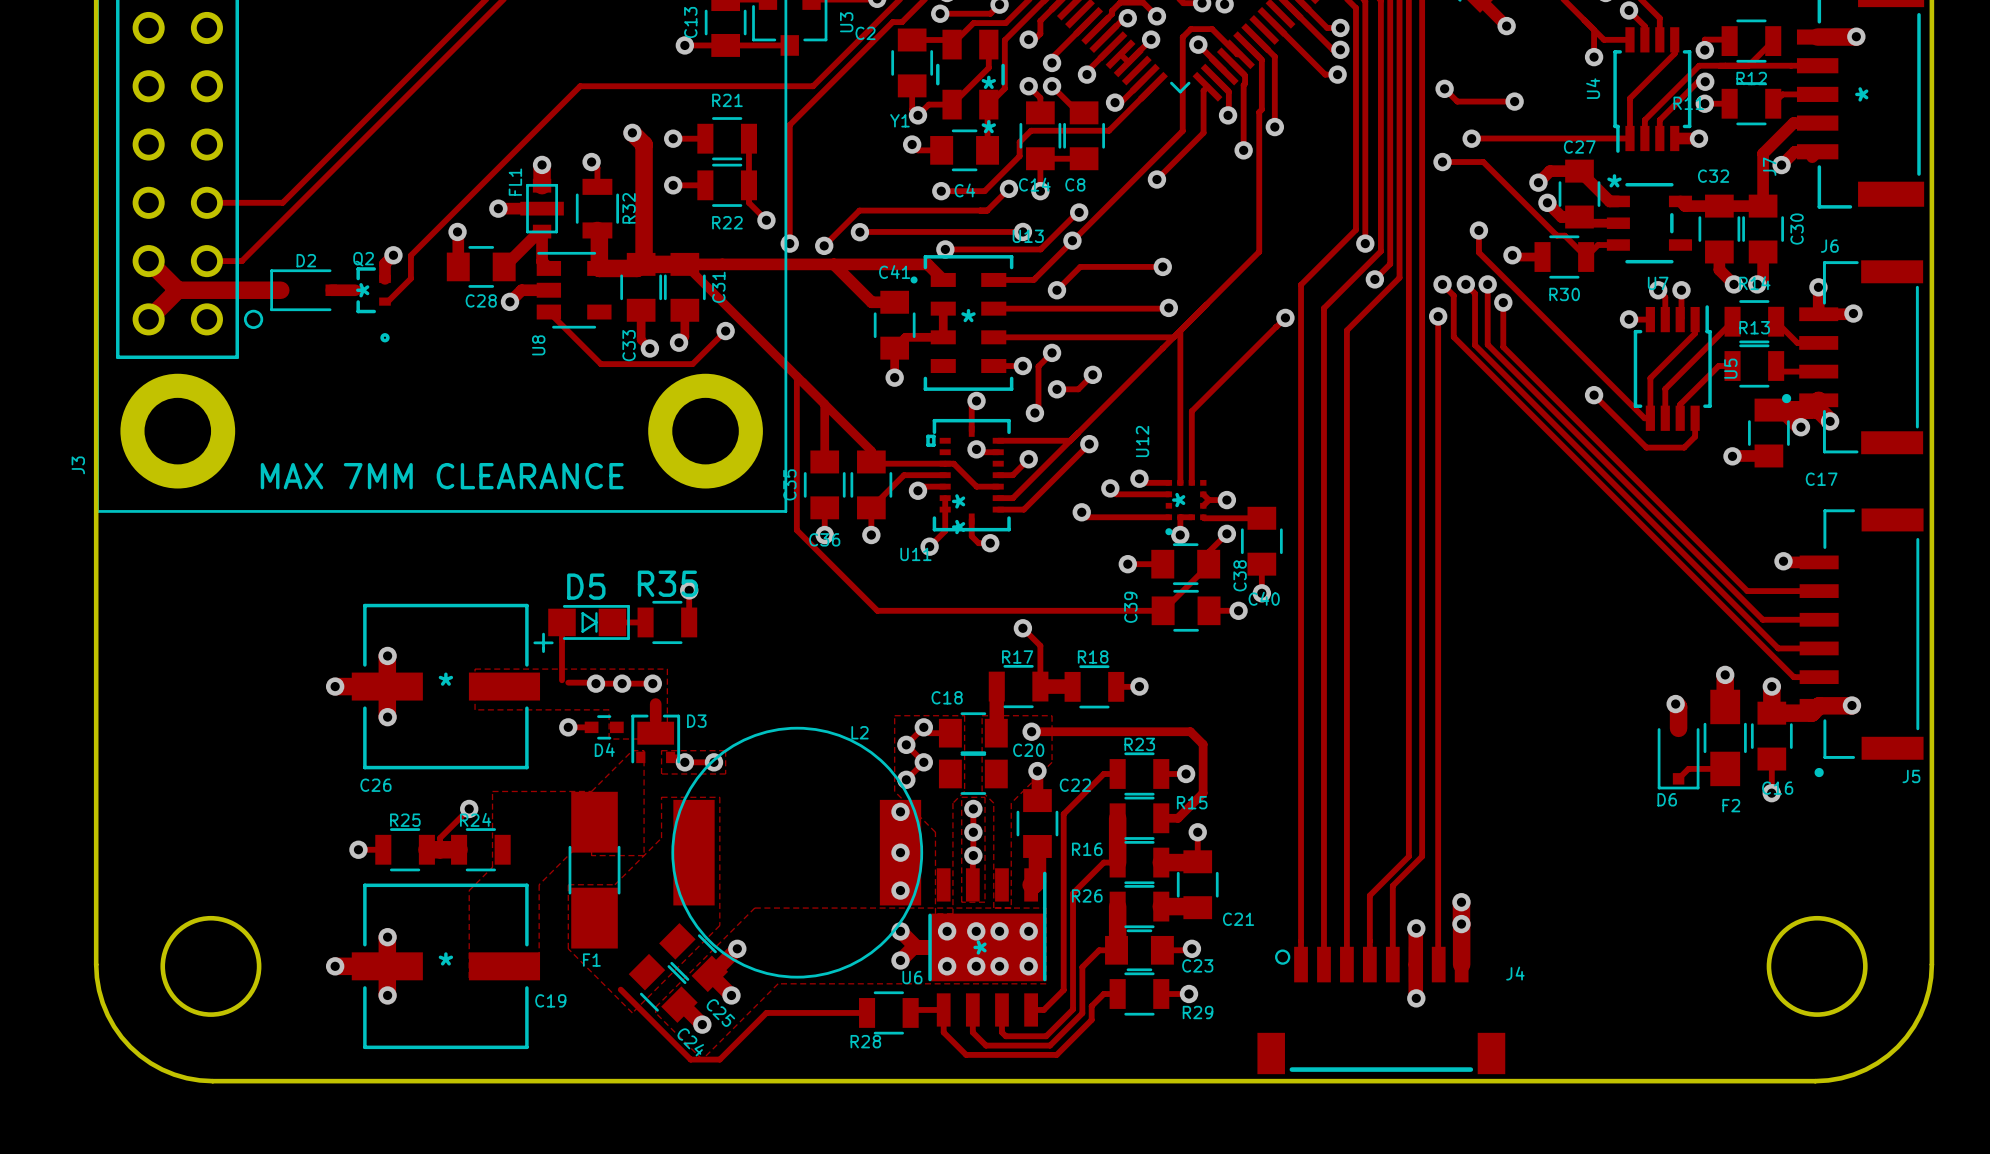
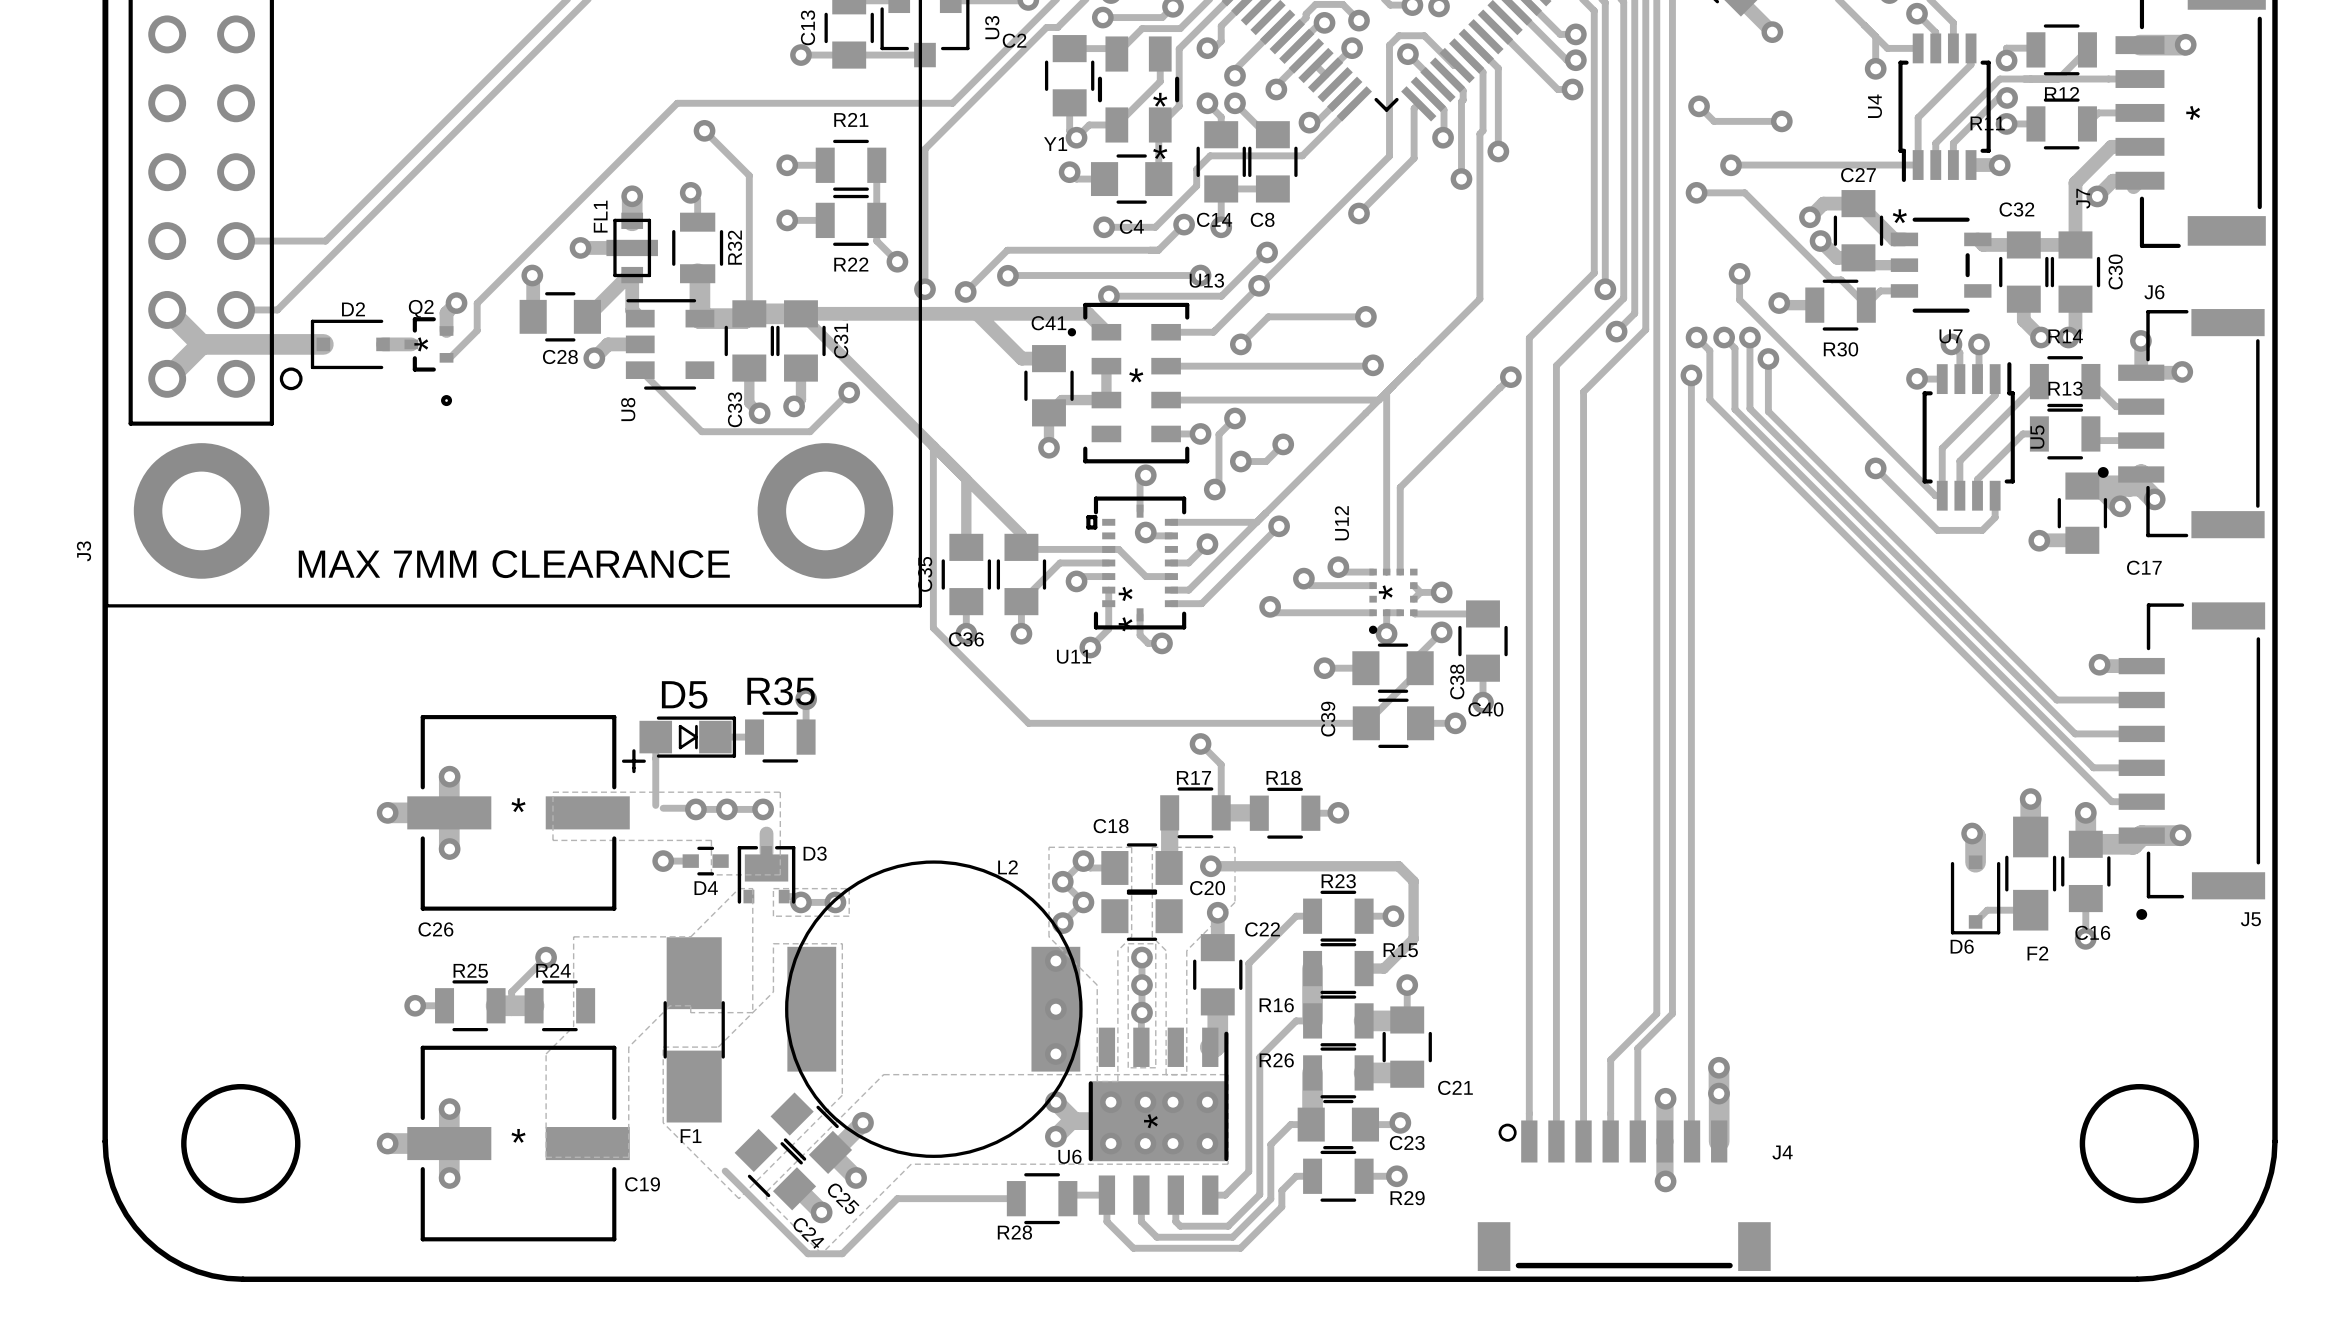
track: (632, 132) (644, 144) (644, 261) (641, 264) -> (704, 130) (749, 175) (749, 313)
via position: (632, 132) -> (704, 130)

